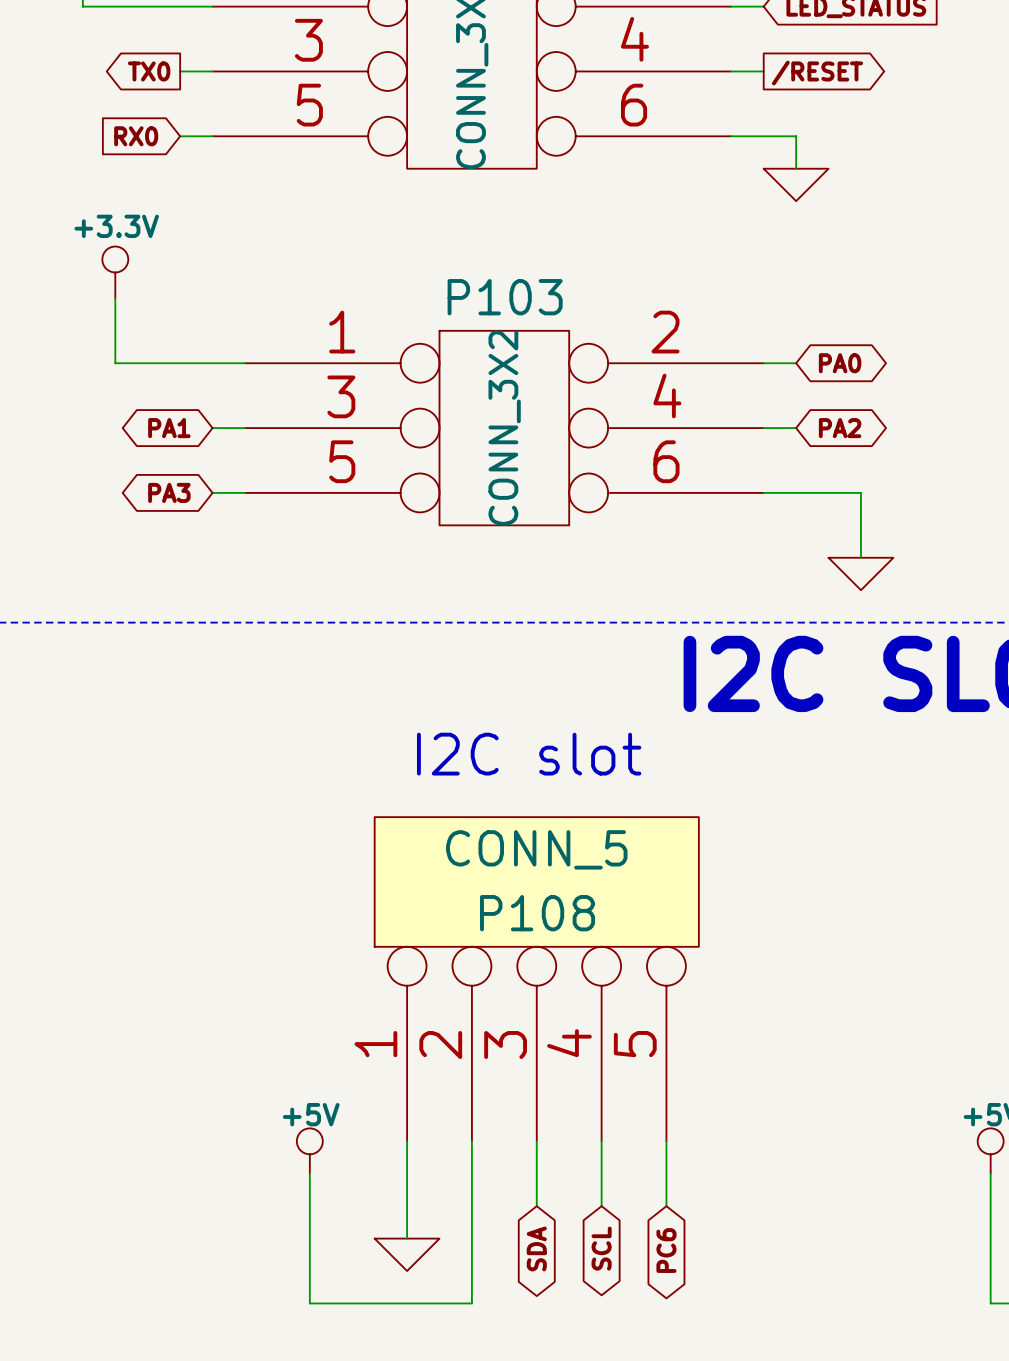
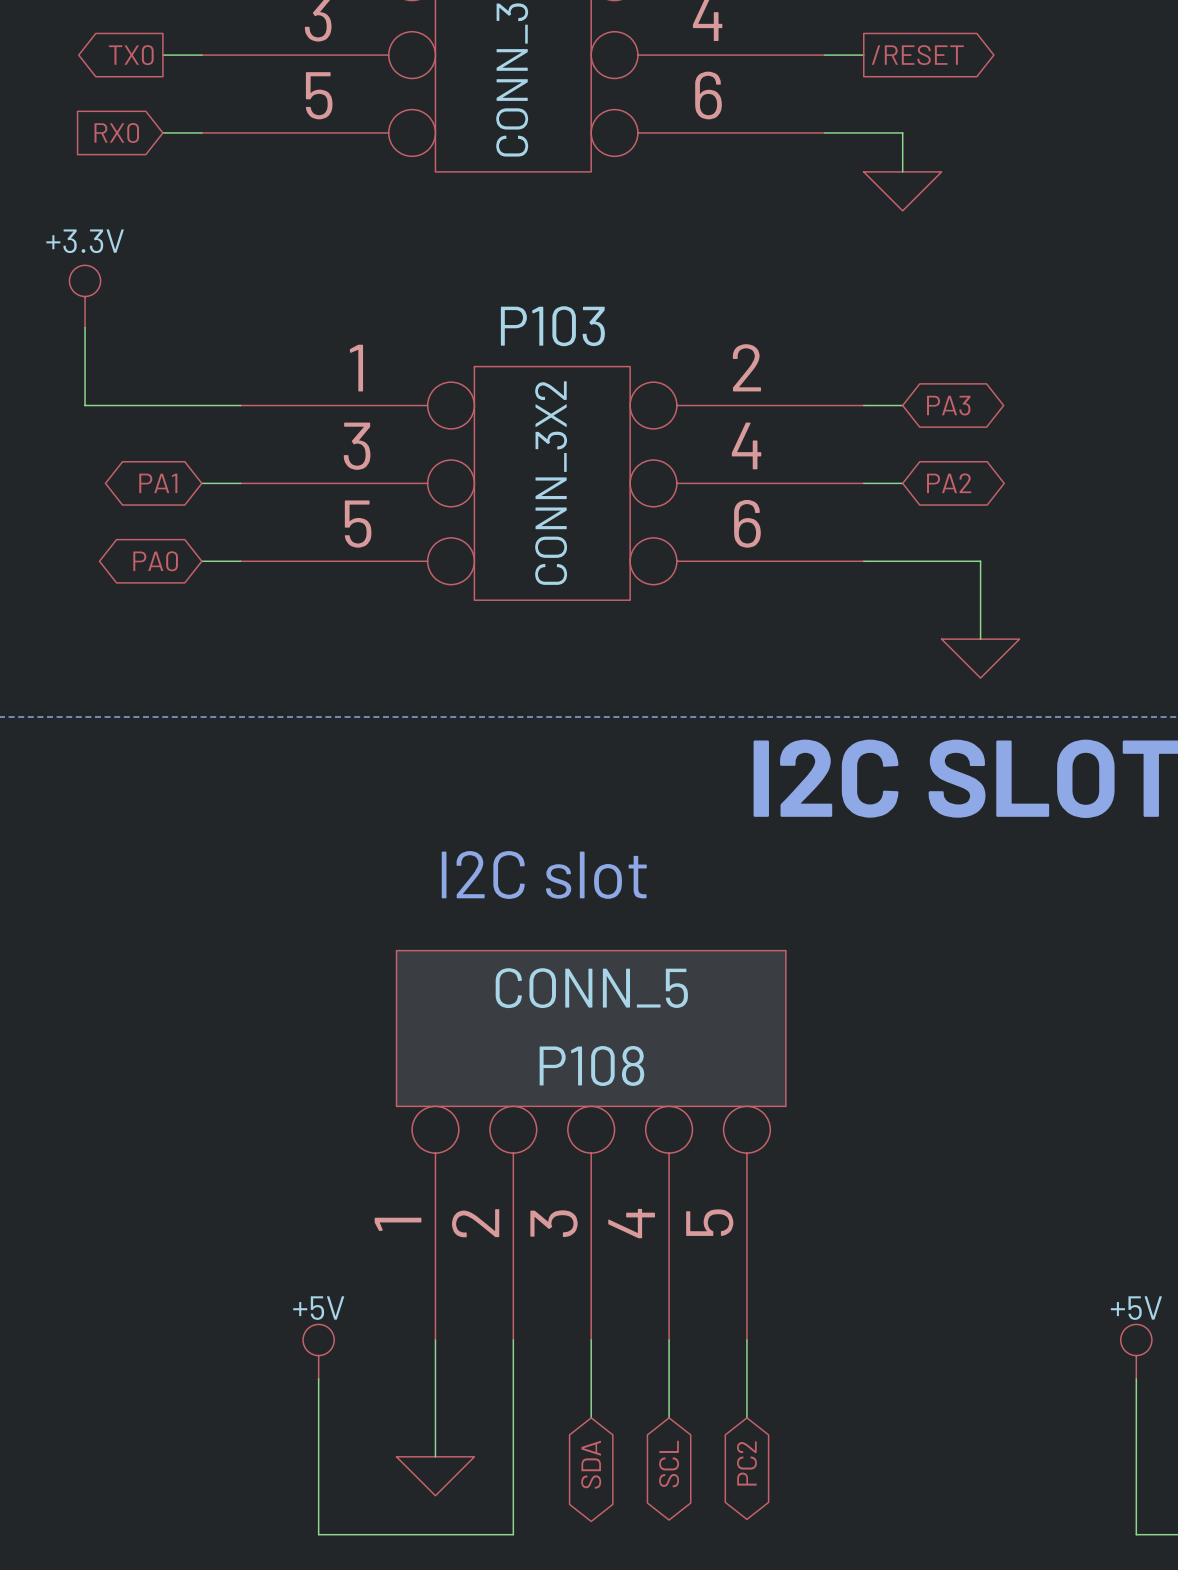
global label: PA0 (840, 363) -> PA3 (948, 405)
global label: PA3 (169, 492) -> PA0 (155, 561)
global label: PC6 (666, 1250) -> PC2 (746, 1463)

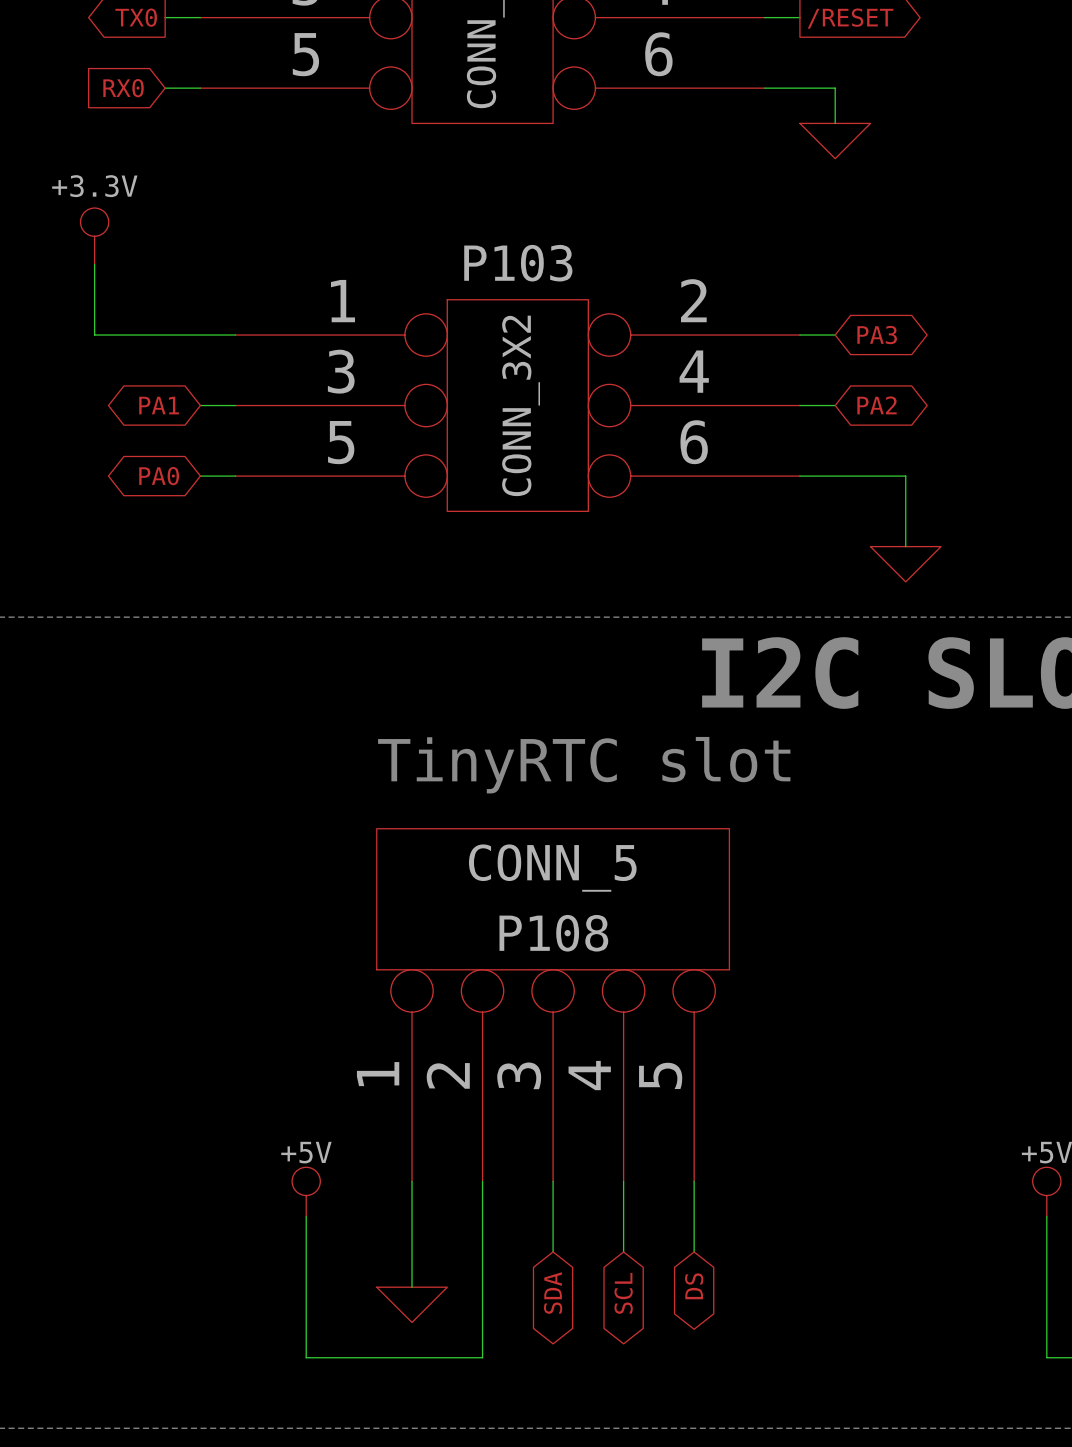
text: I2C slot (544, 874) -> none
text: none -> TinyRTC slot (584, 765)
global label: PC2 (746, 1463) -> DS (694, 1286)

